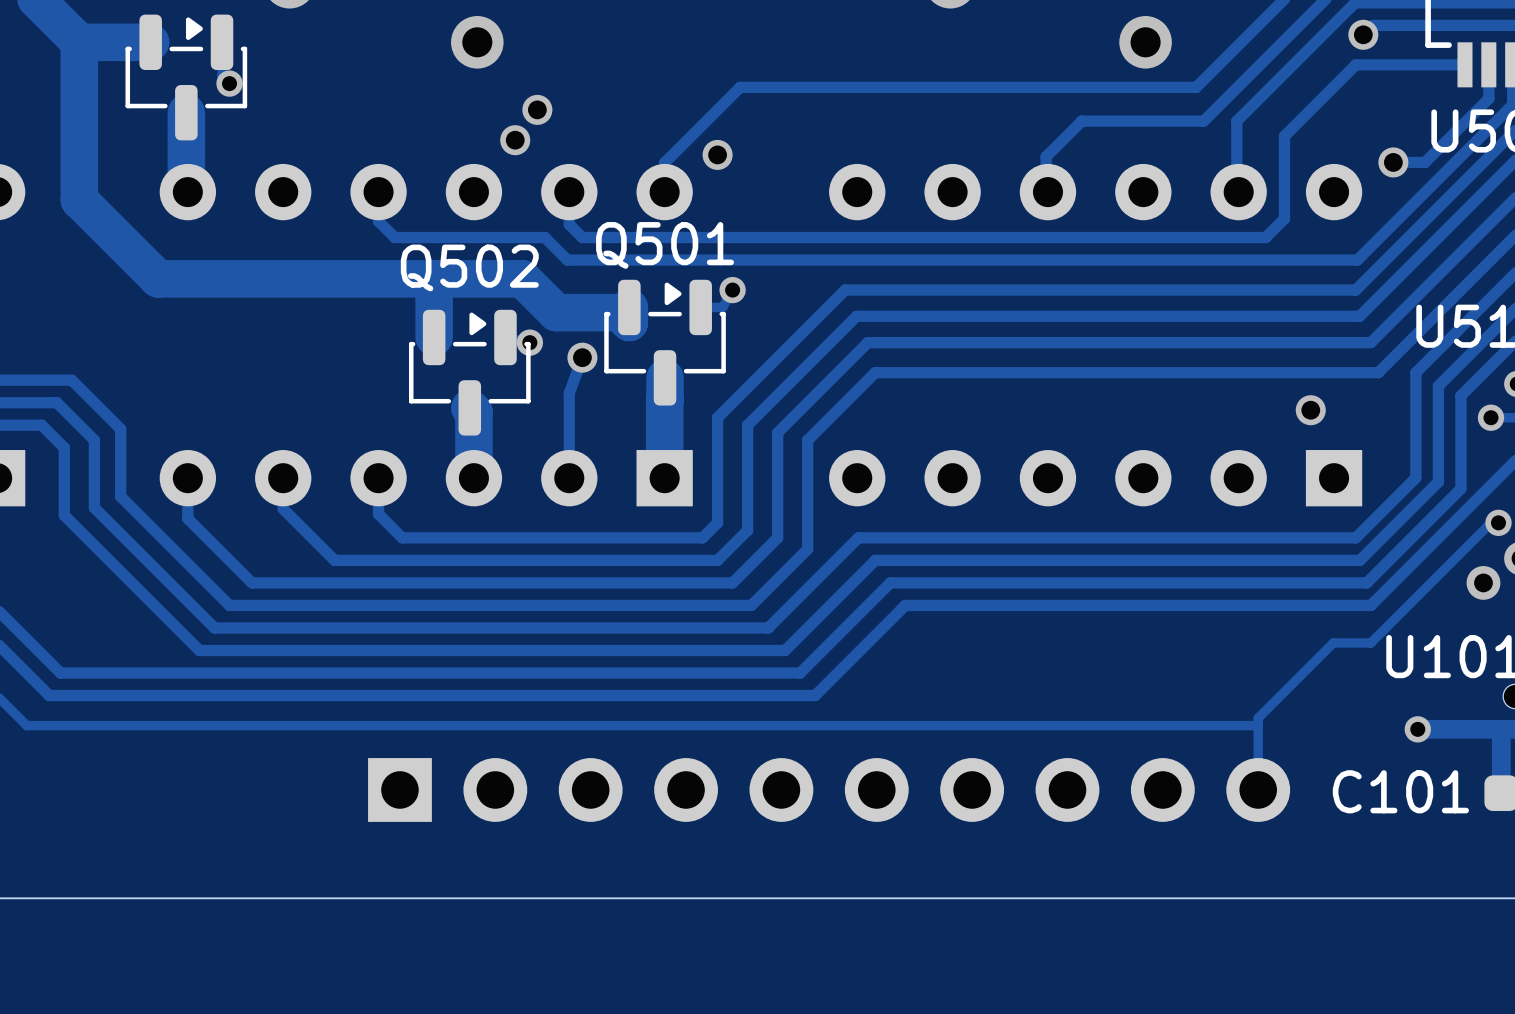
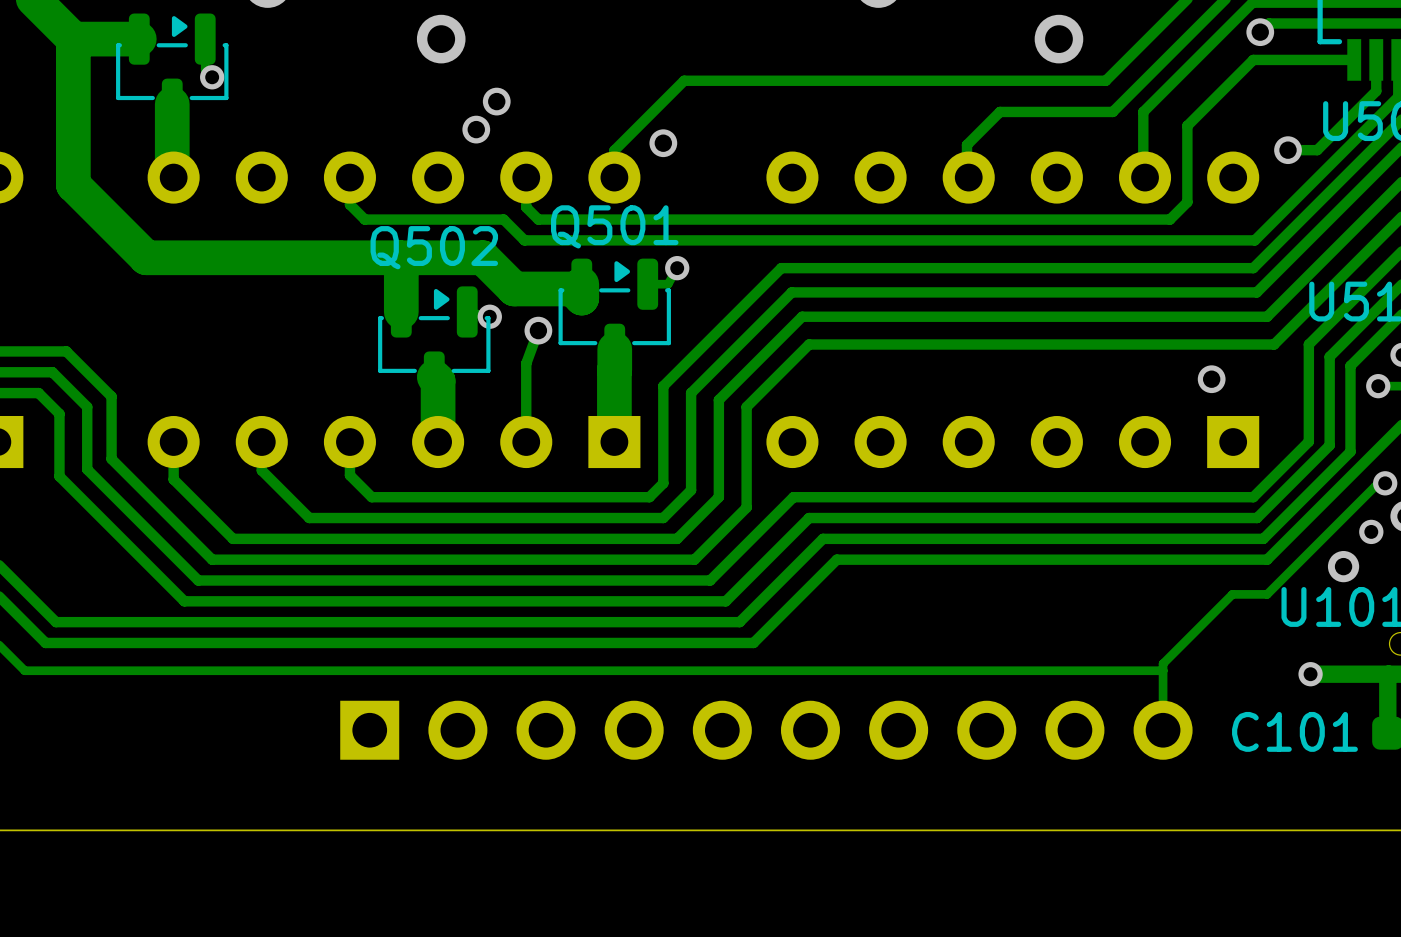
via: none -> (1371, 531)
via position: (1483, 582) -> (1343, 566)

